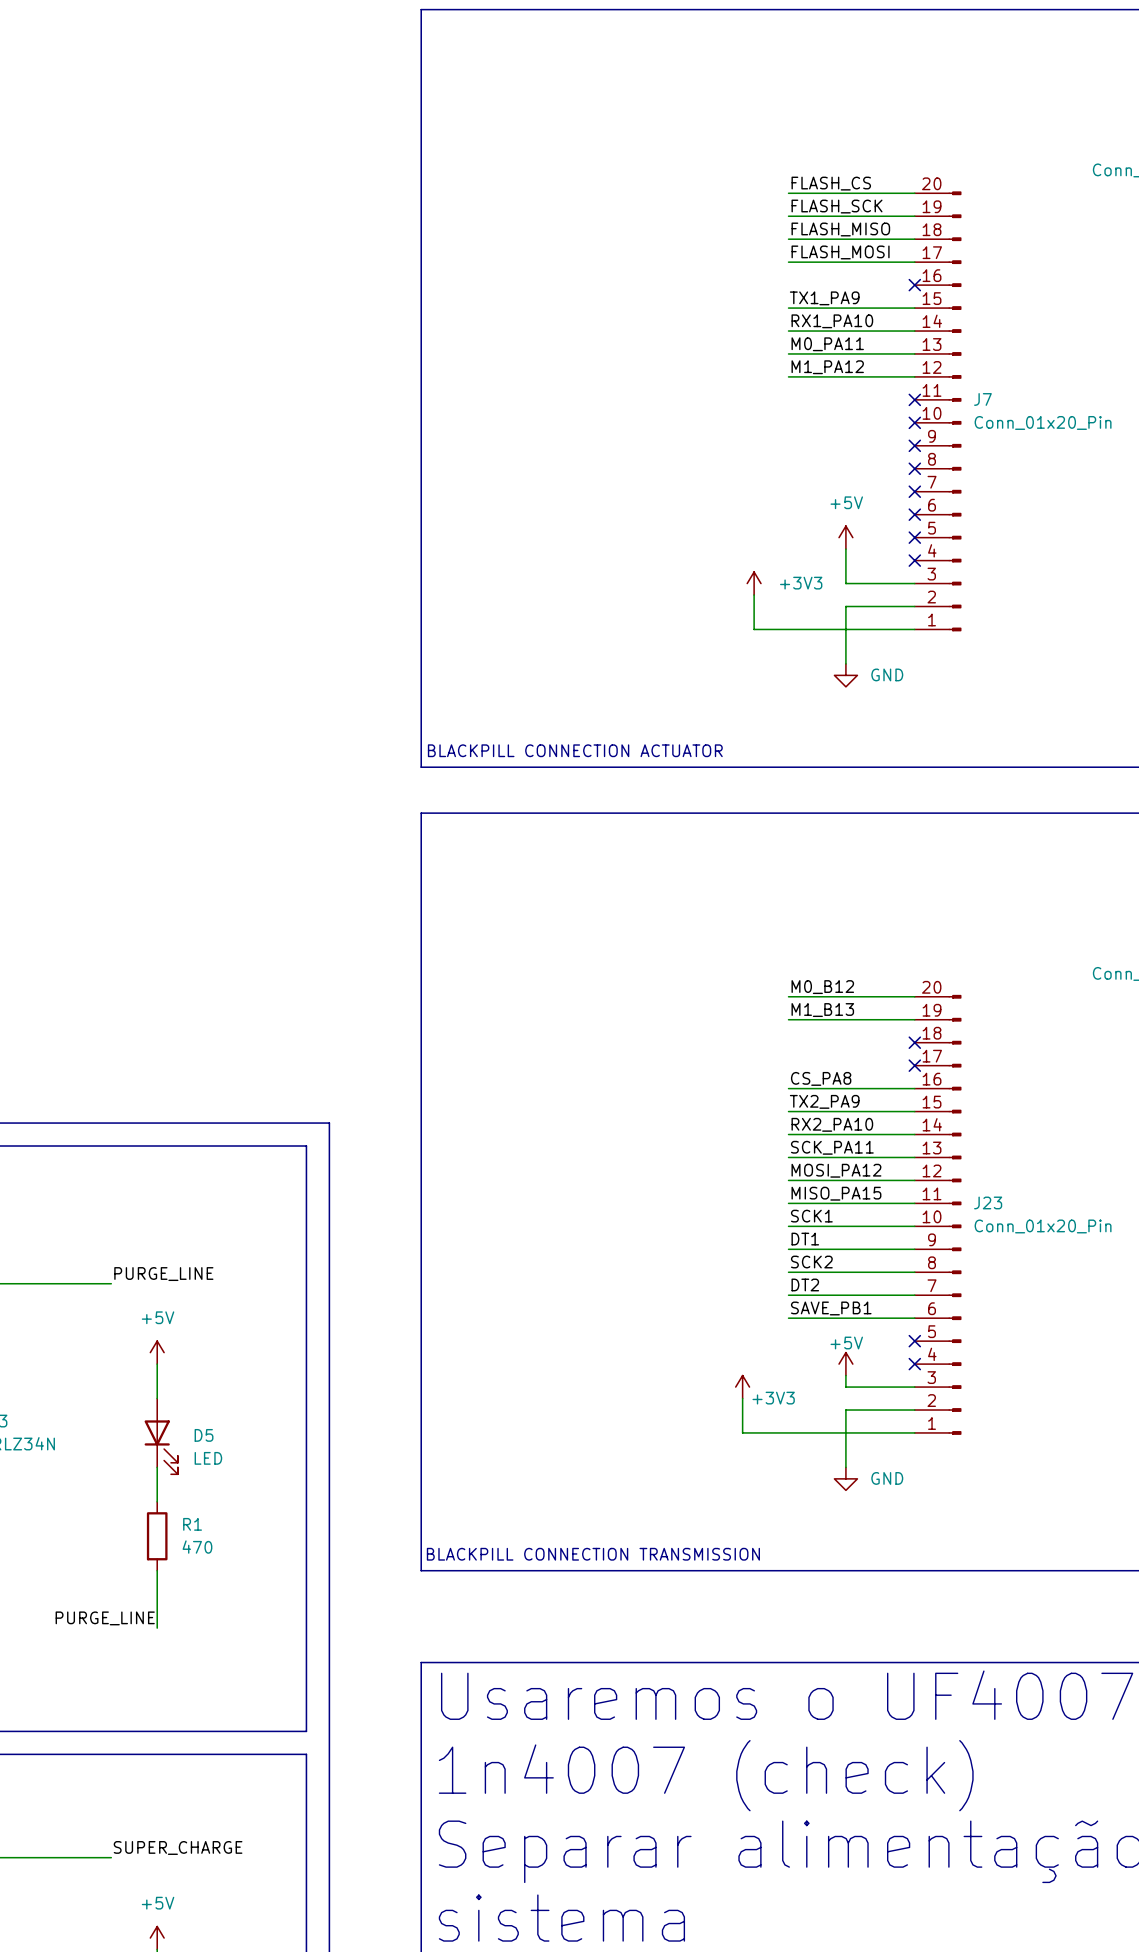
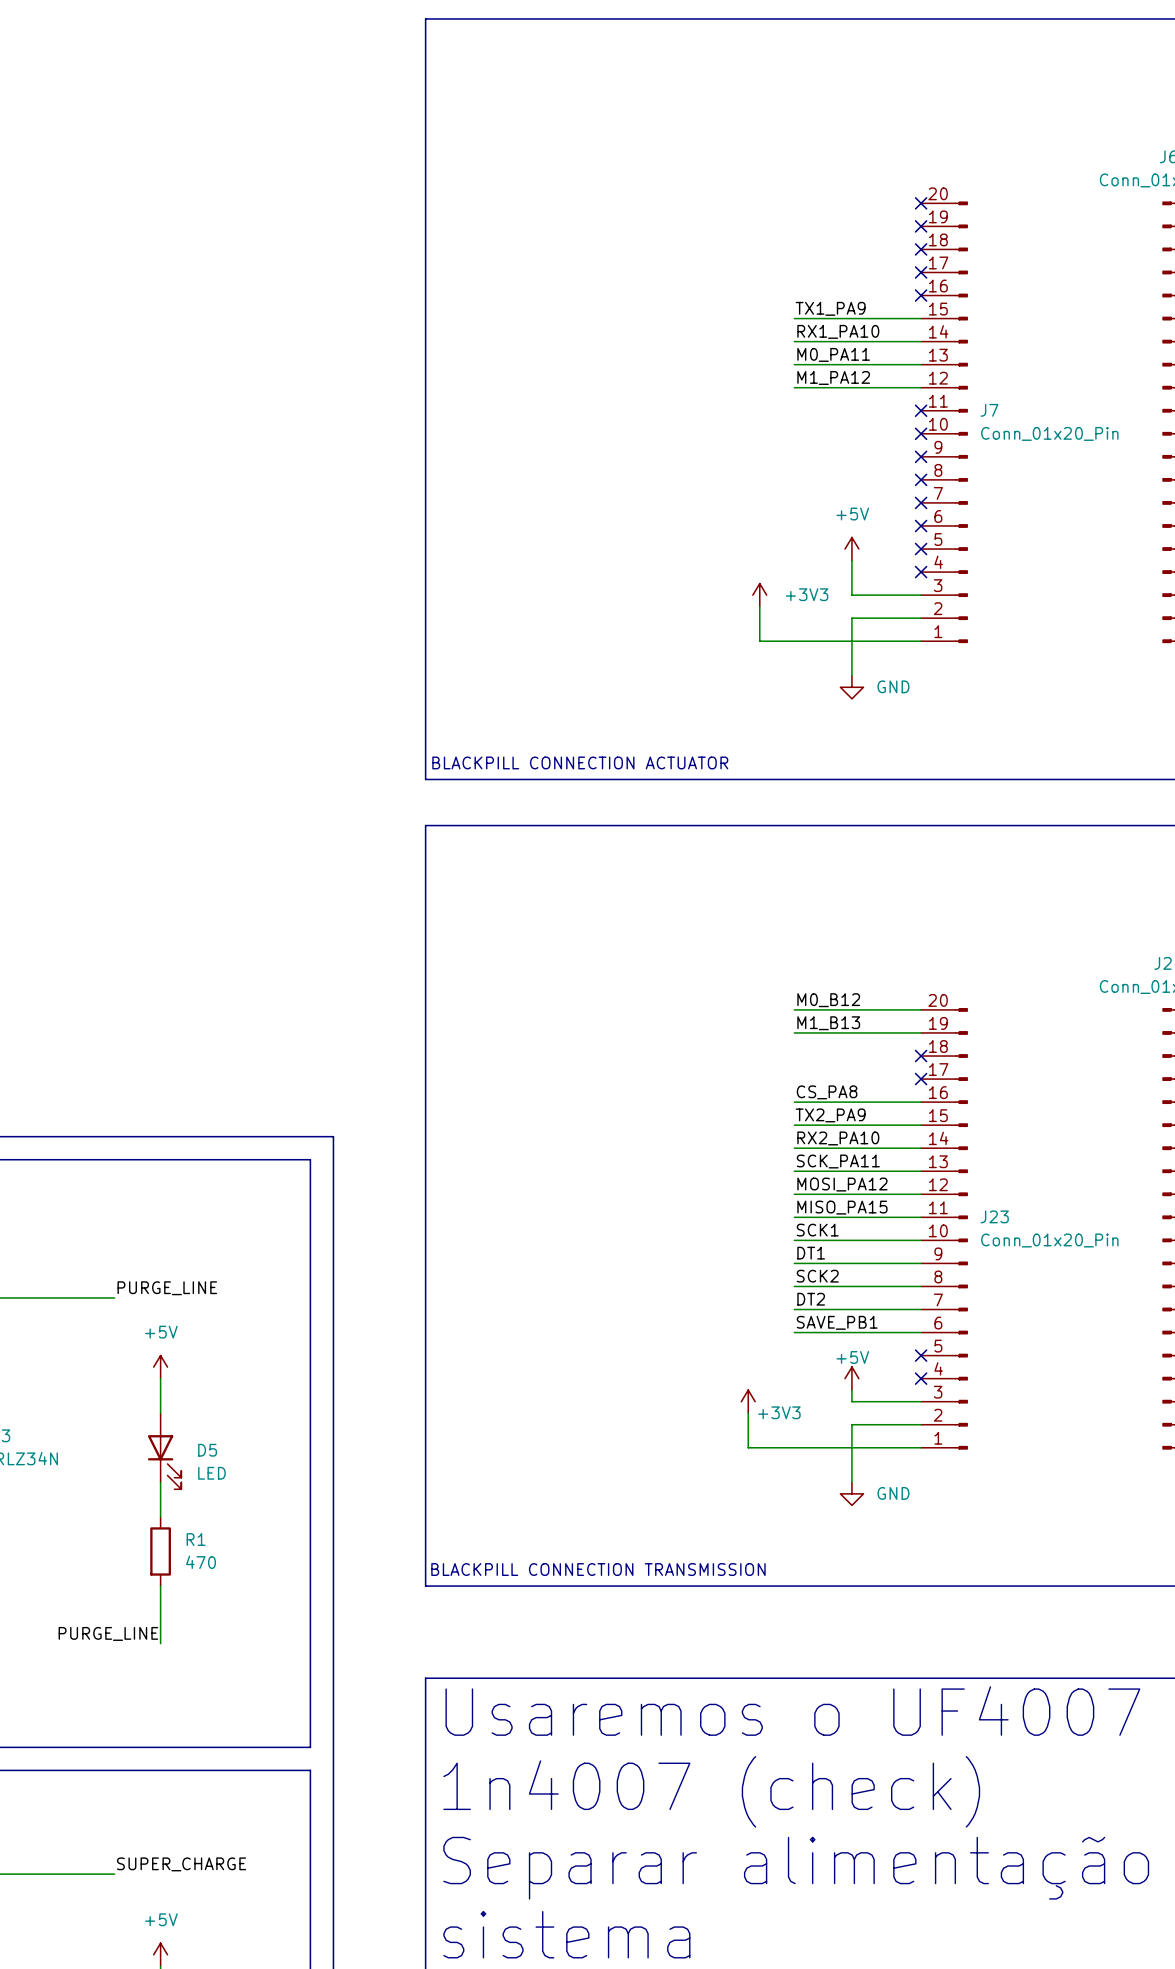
label: FLASH_CS (831, 183) -> none
wire: (788, 193) (914, 193) -> none
no-connect mark: none -> (921, 203)
label: FLASH_SCK (837, 206) -> none
wire: (788, 216) (914, 216) -> none
no-connect mark: none -> (921, 226)
label: FLASH_MISO (840, 229) -> none
wire: (788, 239) (914, 239) -> none
no-connect mark: none -> (921, 249)
label: FLASH_MOSI (840, 252) -> none
wire: (788, 262) (914, 262) -> none
no-connect mark: none -> (921, 272)

